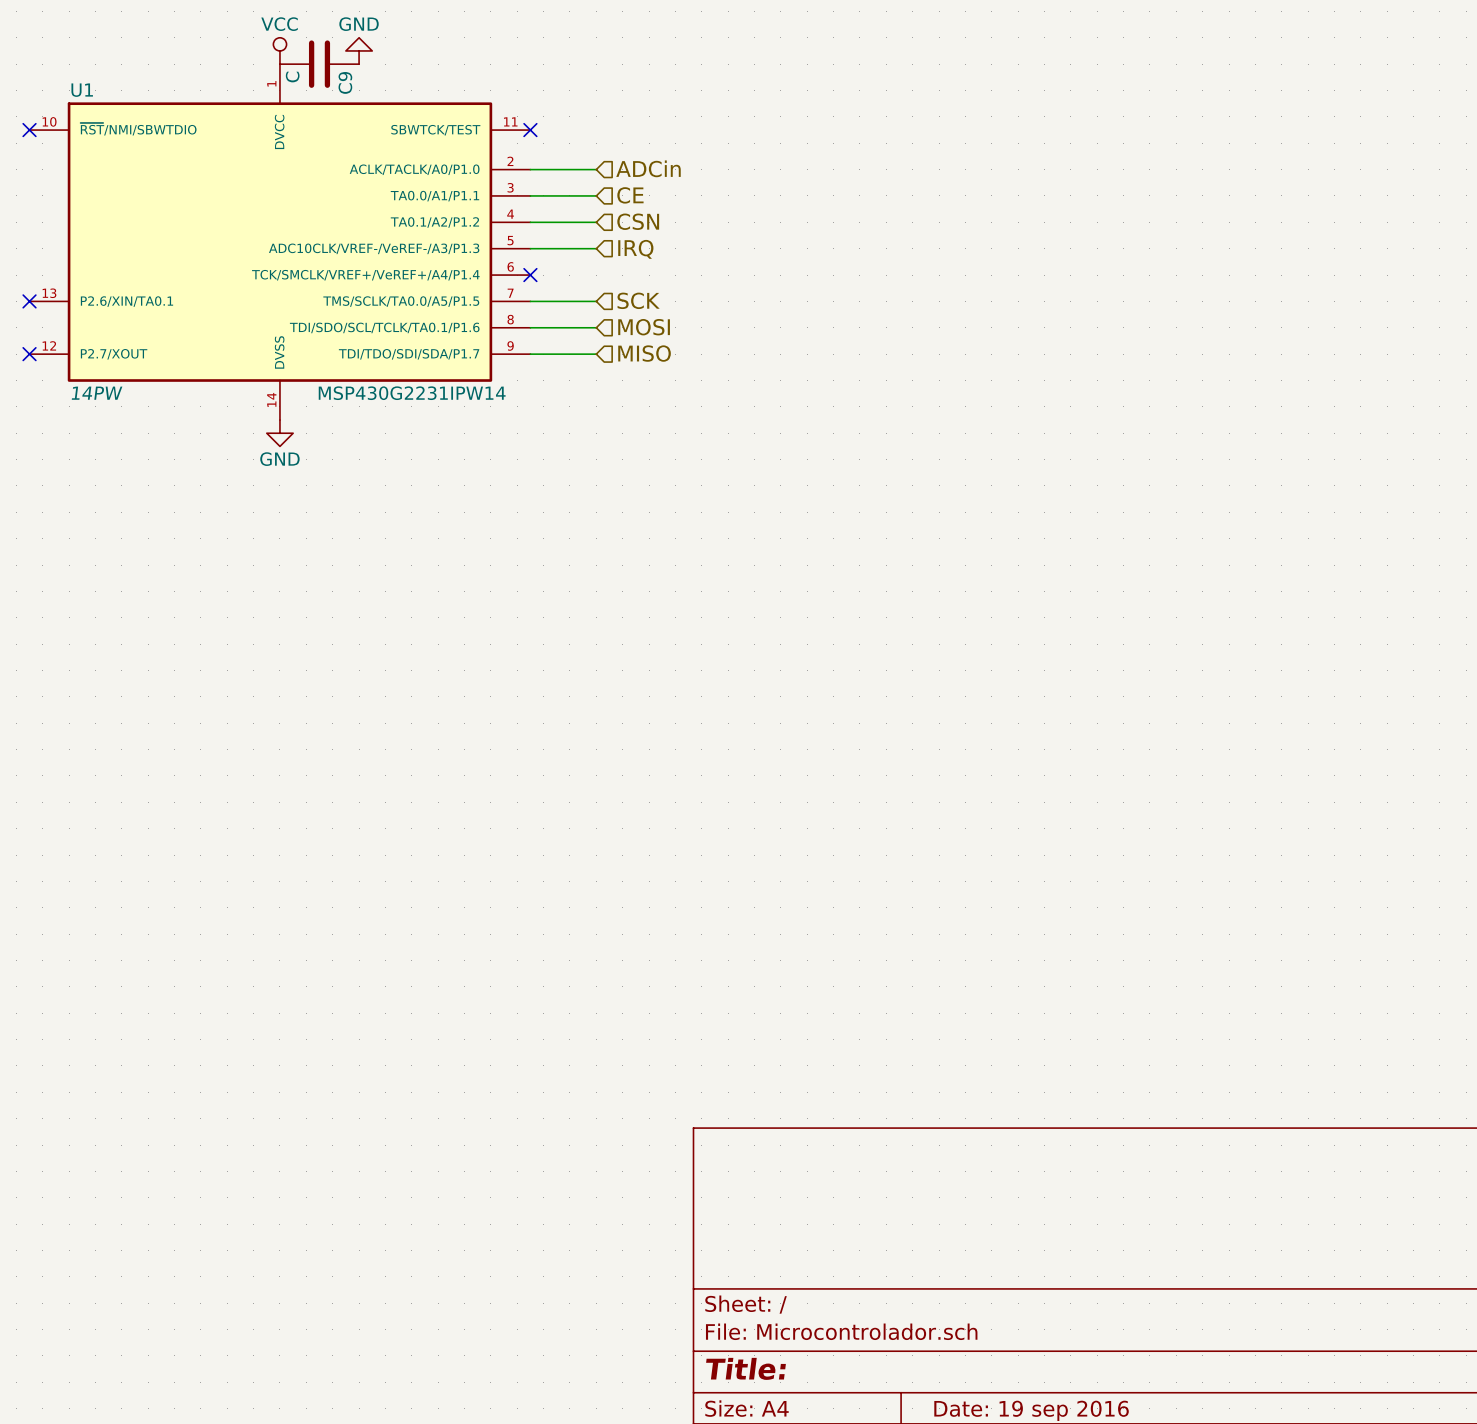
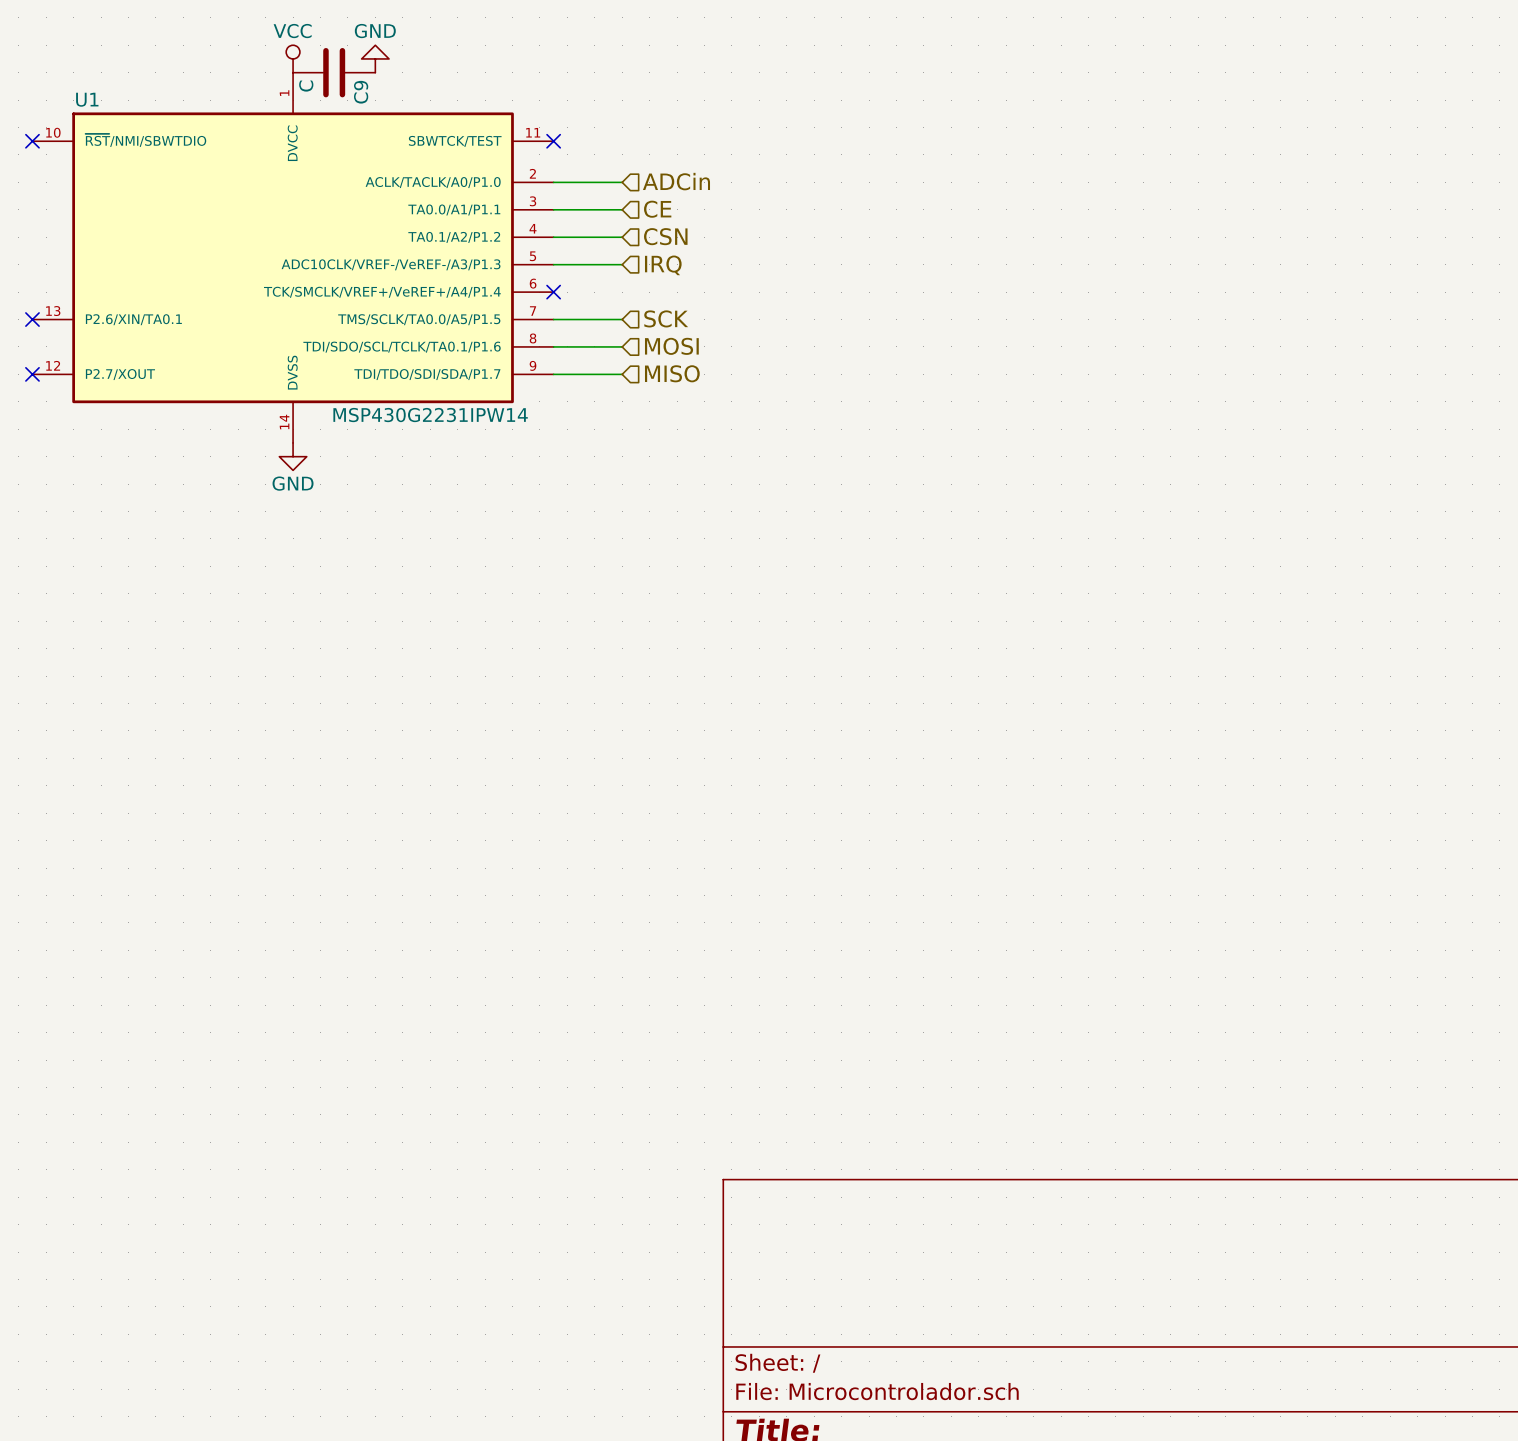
U1 text: 14PW (97, 393) -> none

